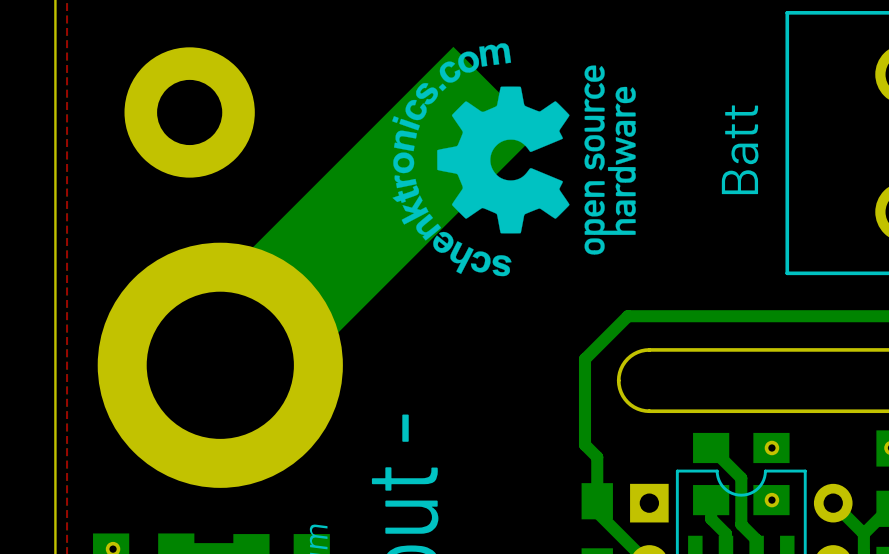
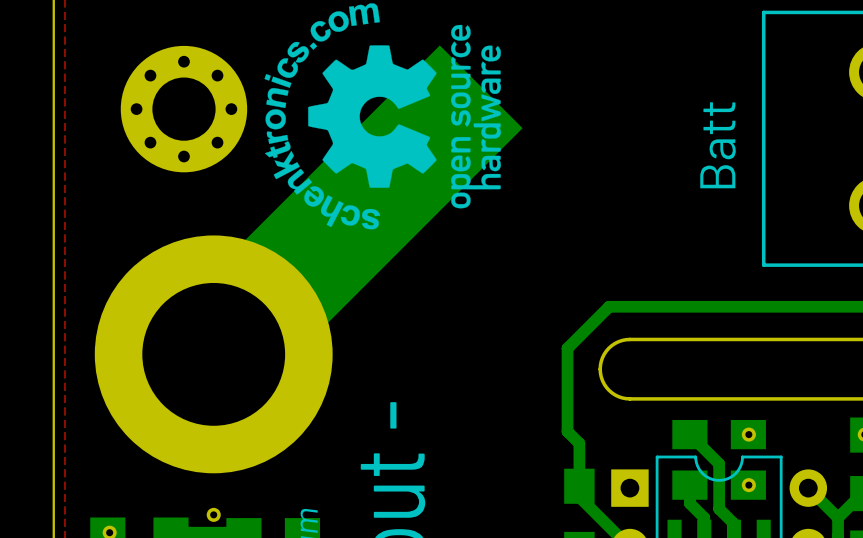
part footprint: [124, 47, 255, 178] -> [120, 45, 248, 173]
drawing position: (514, 159) -> (382, 116)
part: none -> (213, 514)

